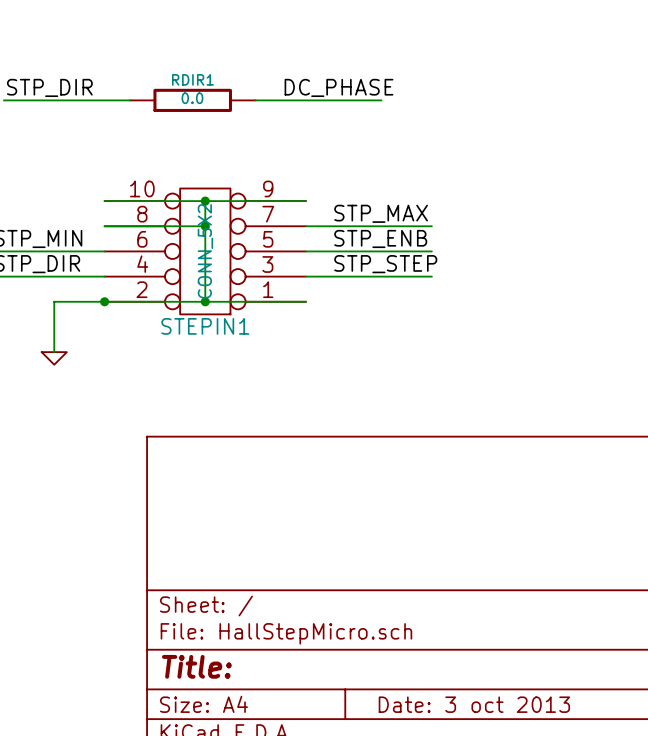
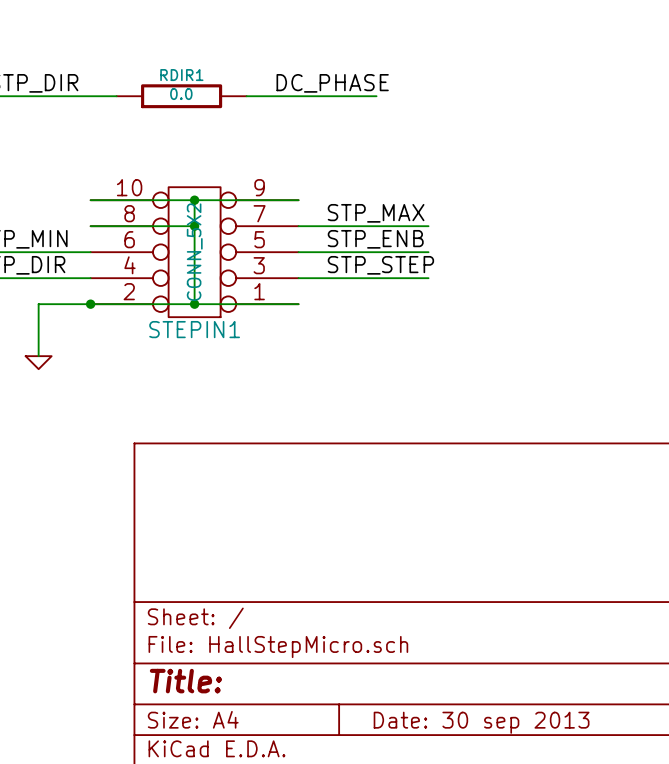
title block: Date: 3 oct 2013 (474, 704) -> Date: 30 sep 2013 (481, 722)

